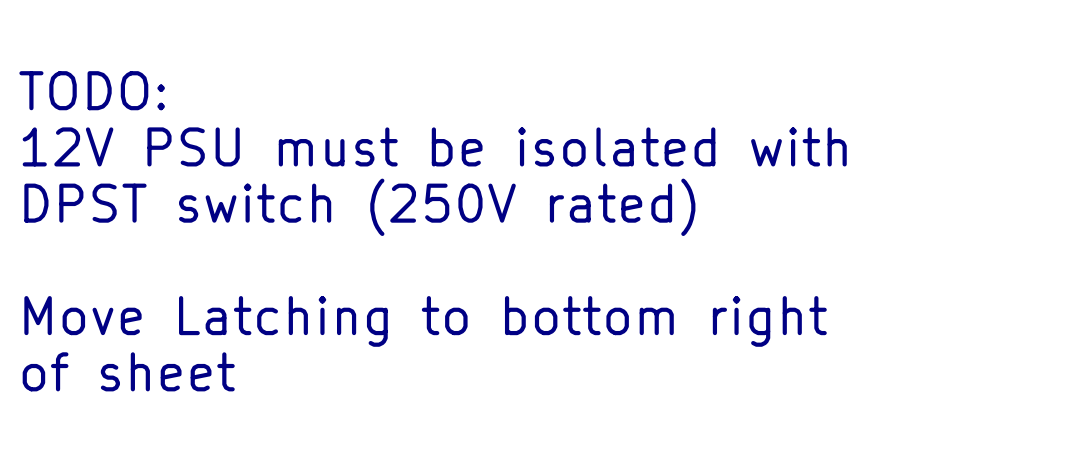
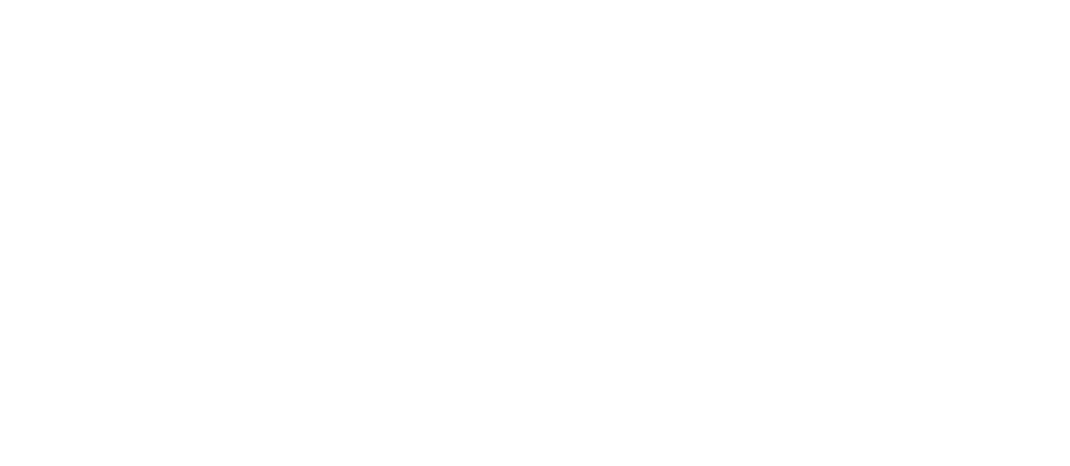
text: TODO: (92, 90) -> none
text: 12V PSU must be isolated with (434, 146) -> none
text: DPST switch (250V rated) (359, 207) -> none
text: Move Latching to bottom right (425, 321) -> none
text: of sheet (128, 371) -> none

